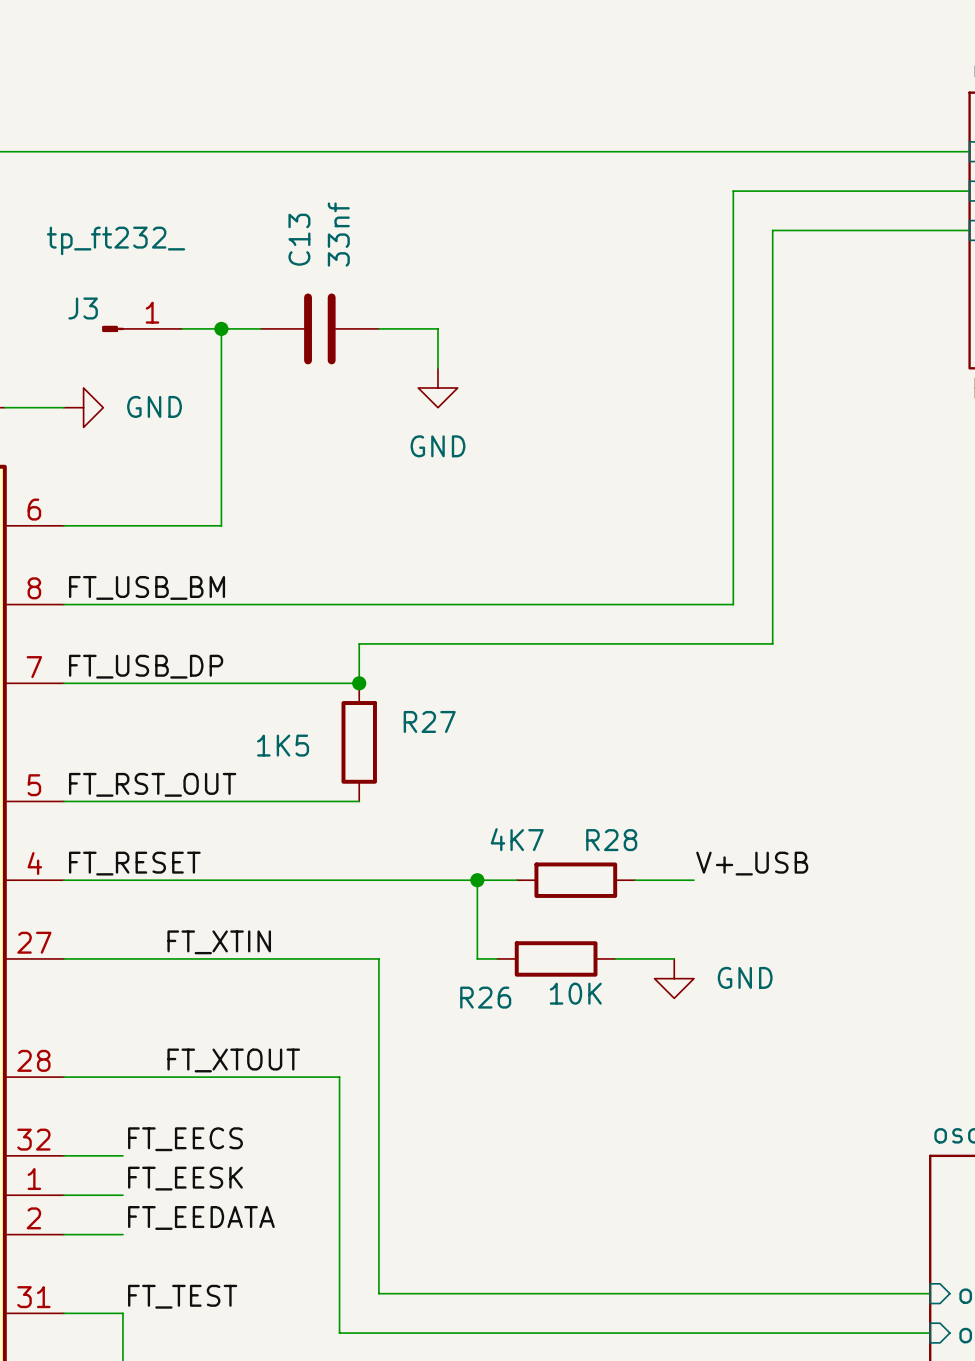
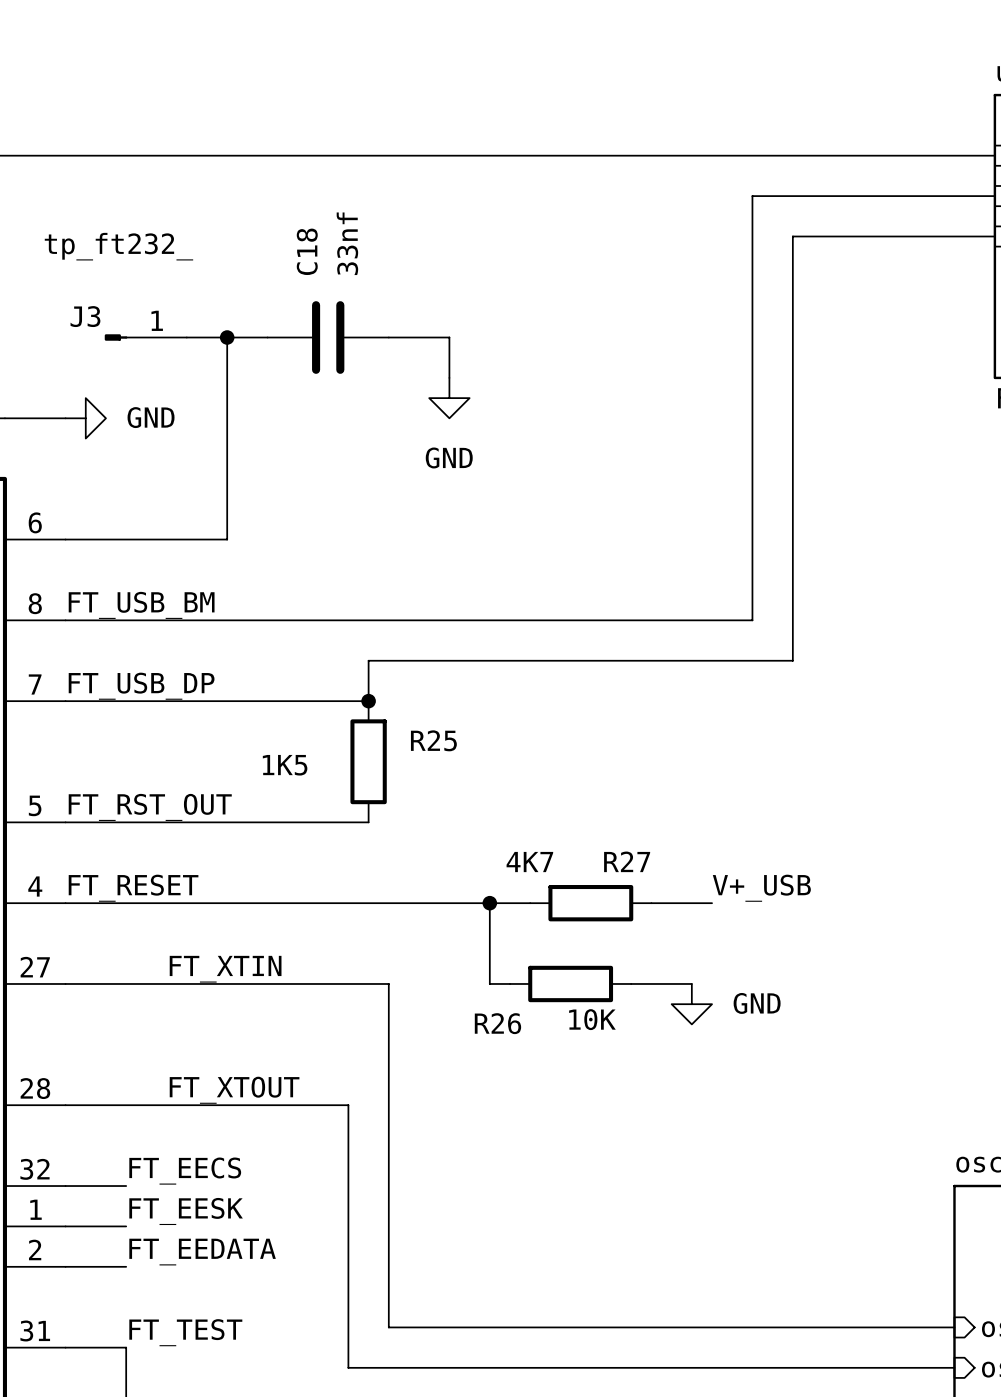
C13 name: C13 (299, 239) -> C18 (307, 251)
R27 name: R27 (429, 721) -> R25 (433, 740)
R28 name: R28 (611, 840) -> R27 (627, 861)

